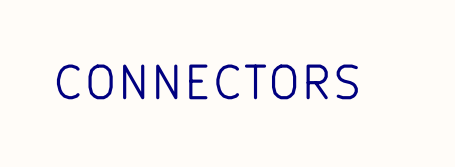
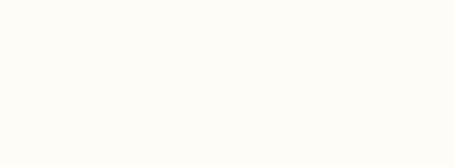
text: CONNECTORS (207, 81) -> none

